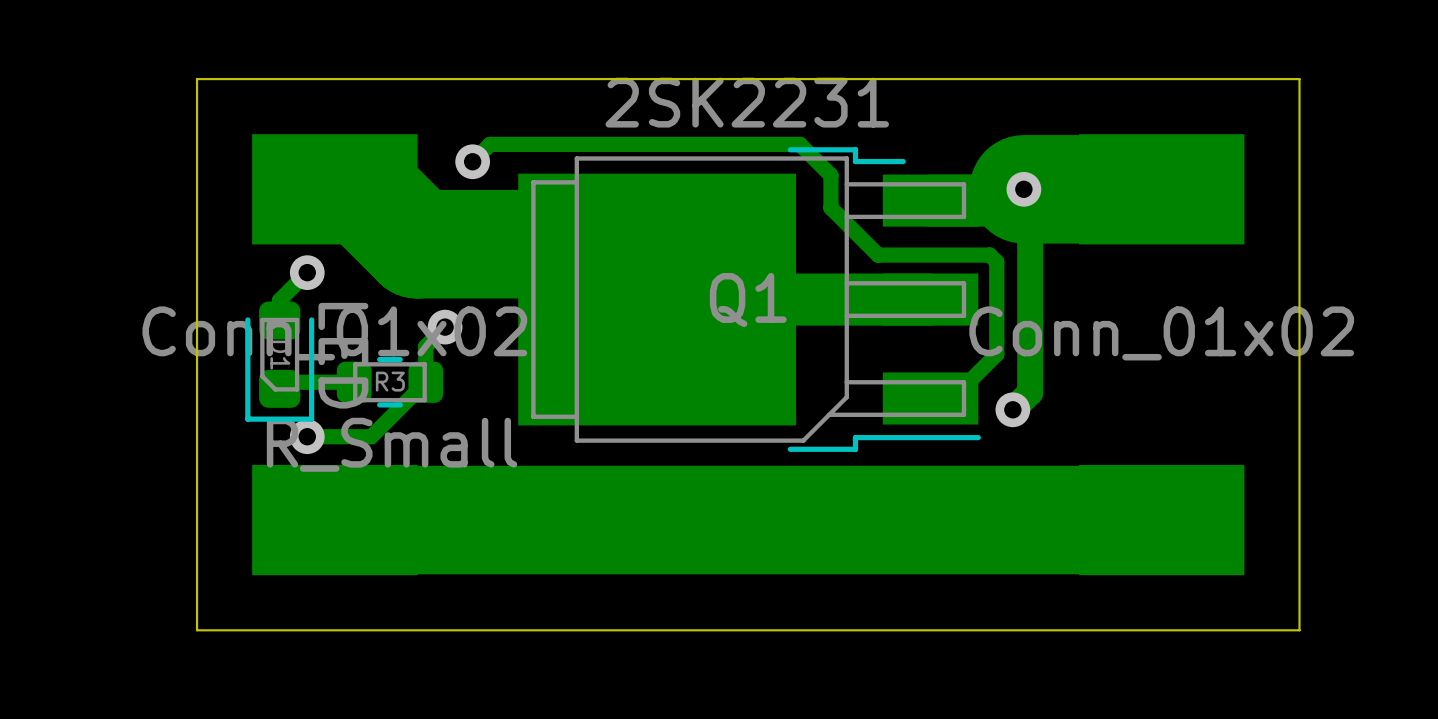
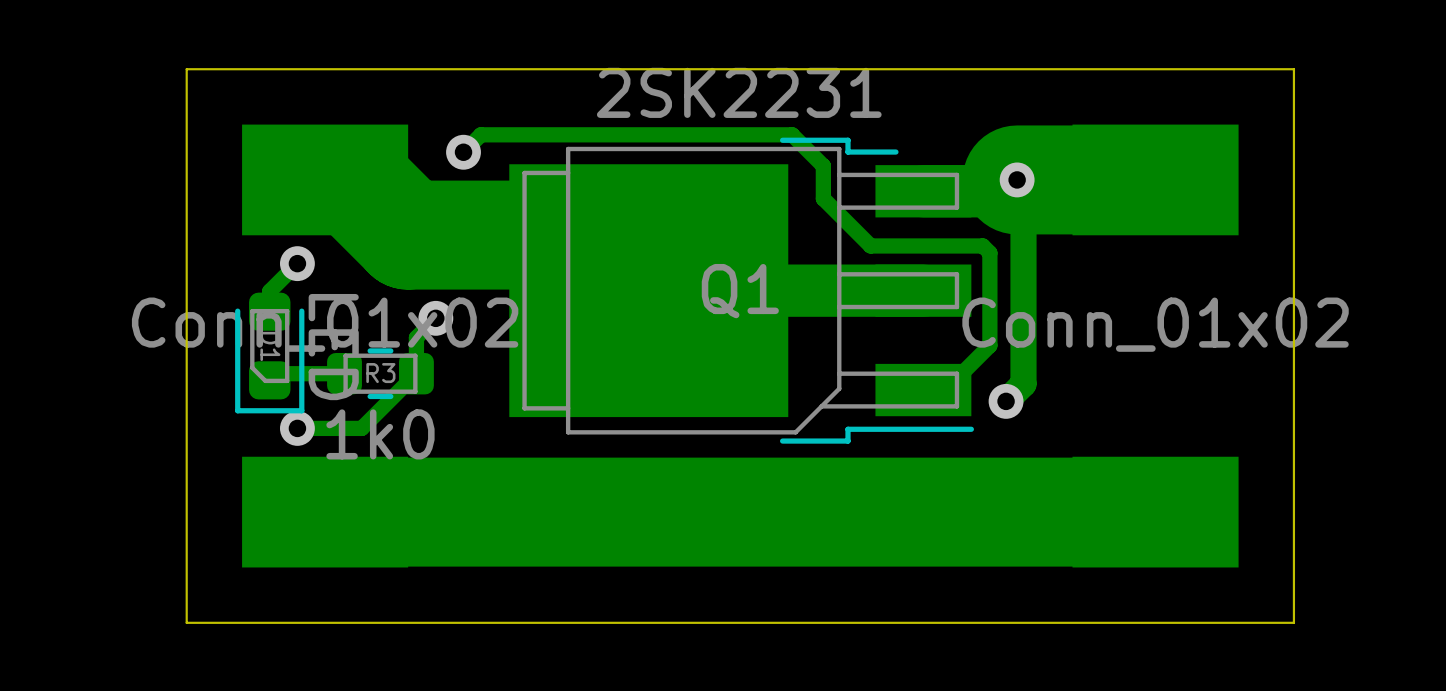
R3 value: R_Small (392, 444) -> 1k0 (380, 434)

